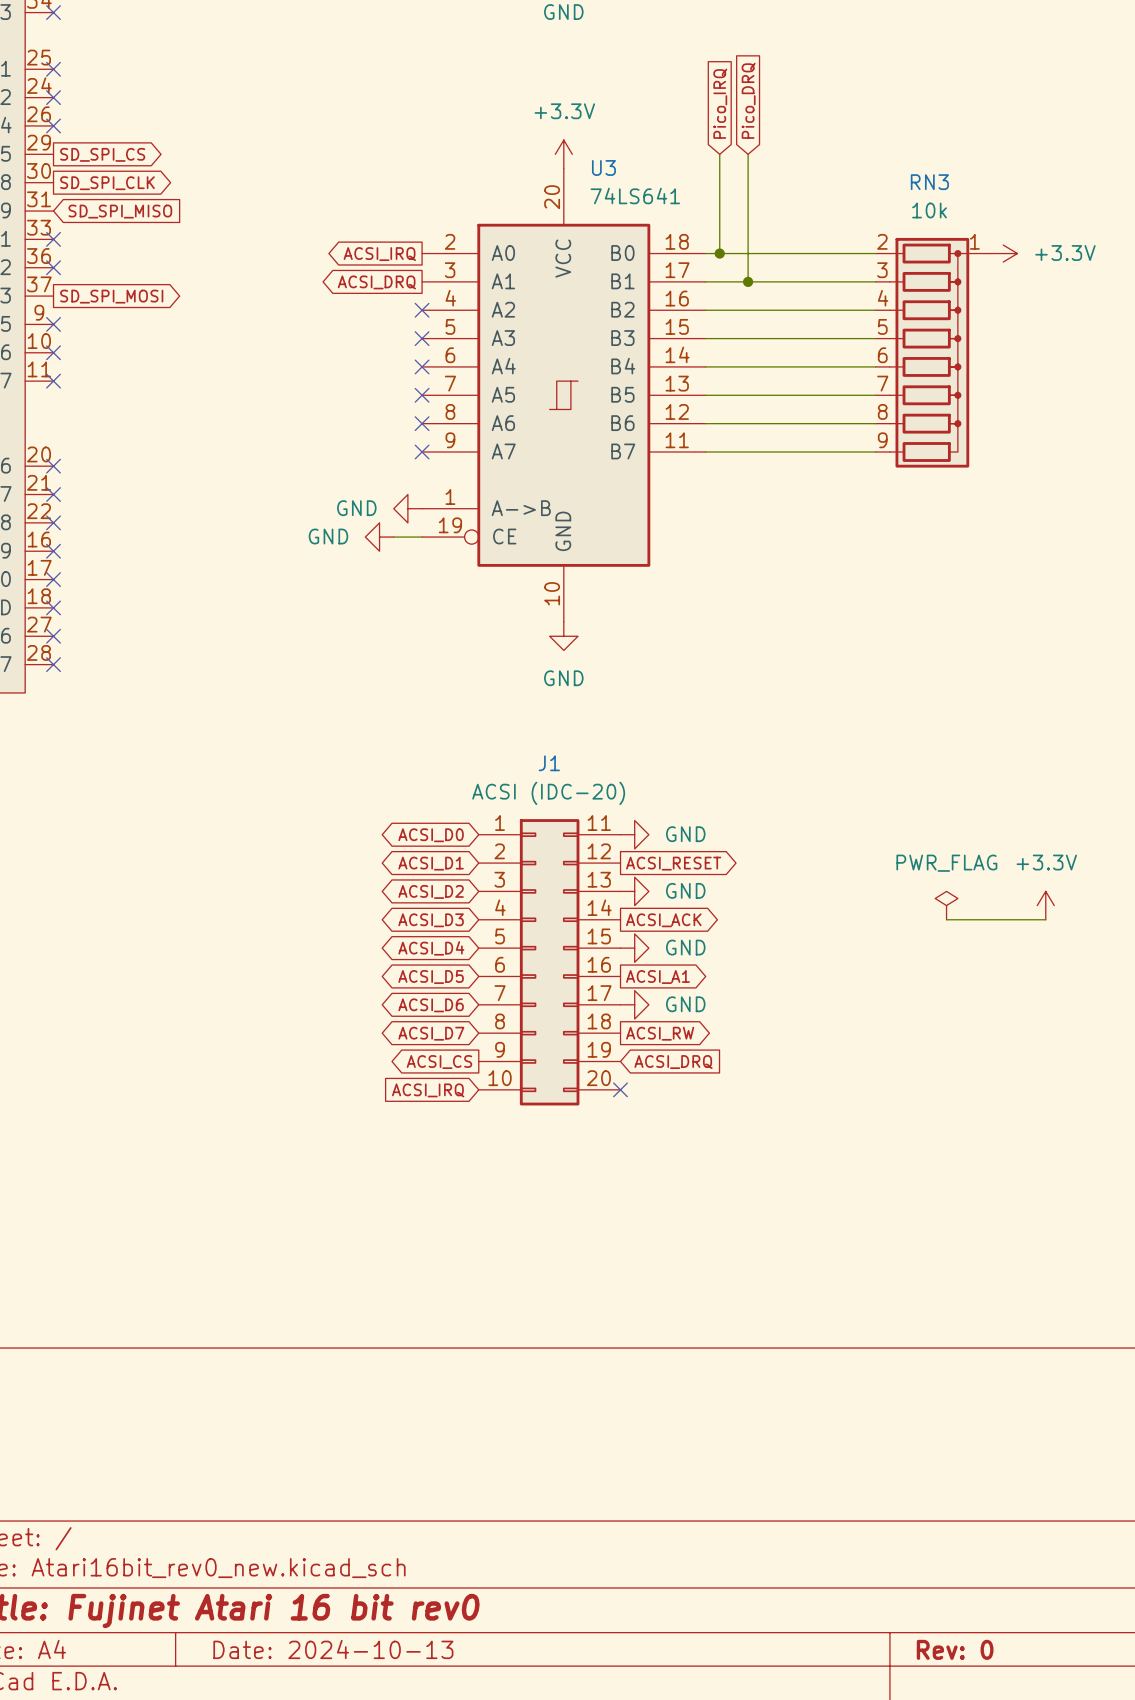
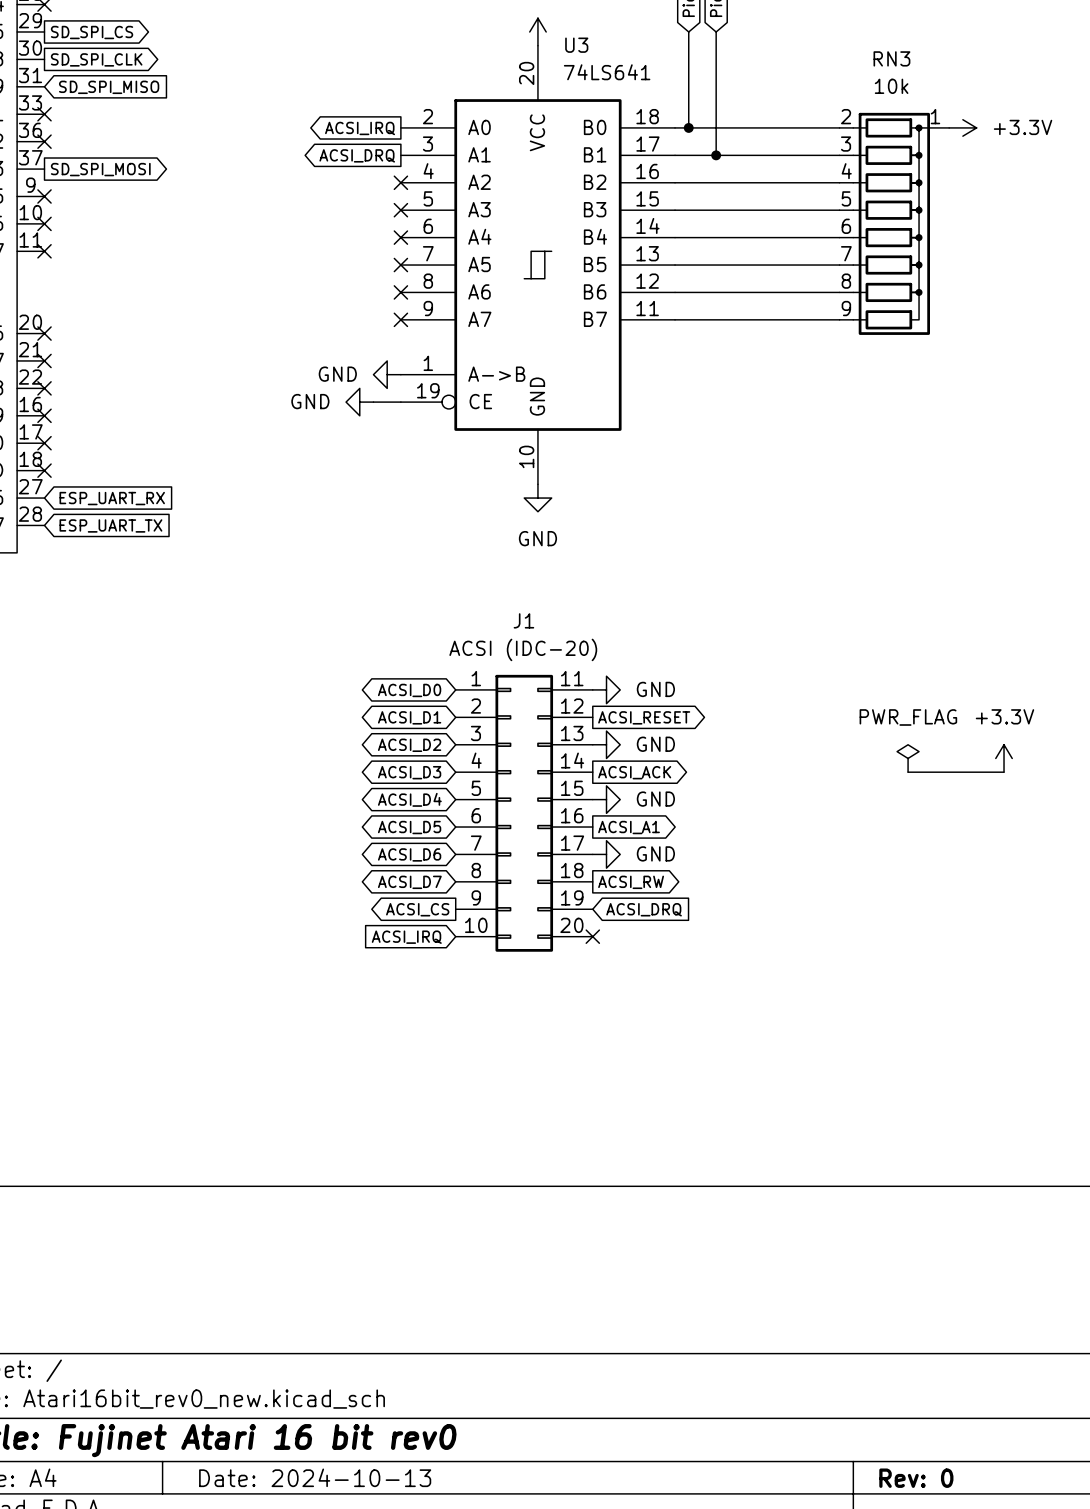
no-connect mark: (53, 636) -> none
global label: none -> ESP_UART_RX (112, 498)
no-connect mark: (53, 664) -> none
global label: none -> ESP_UART_TX (110, 525)

